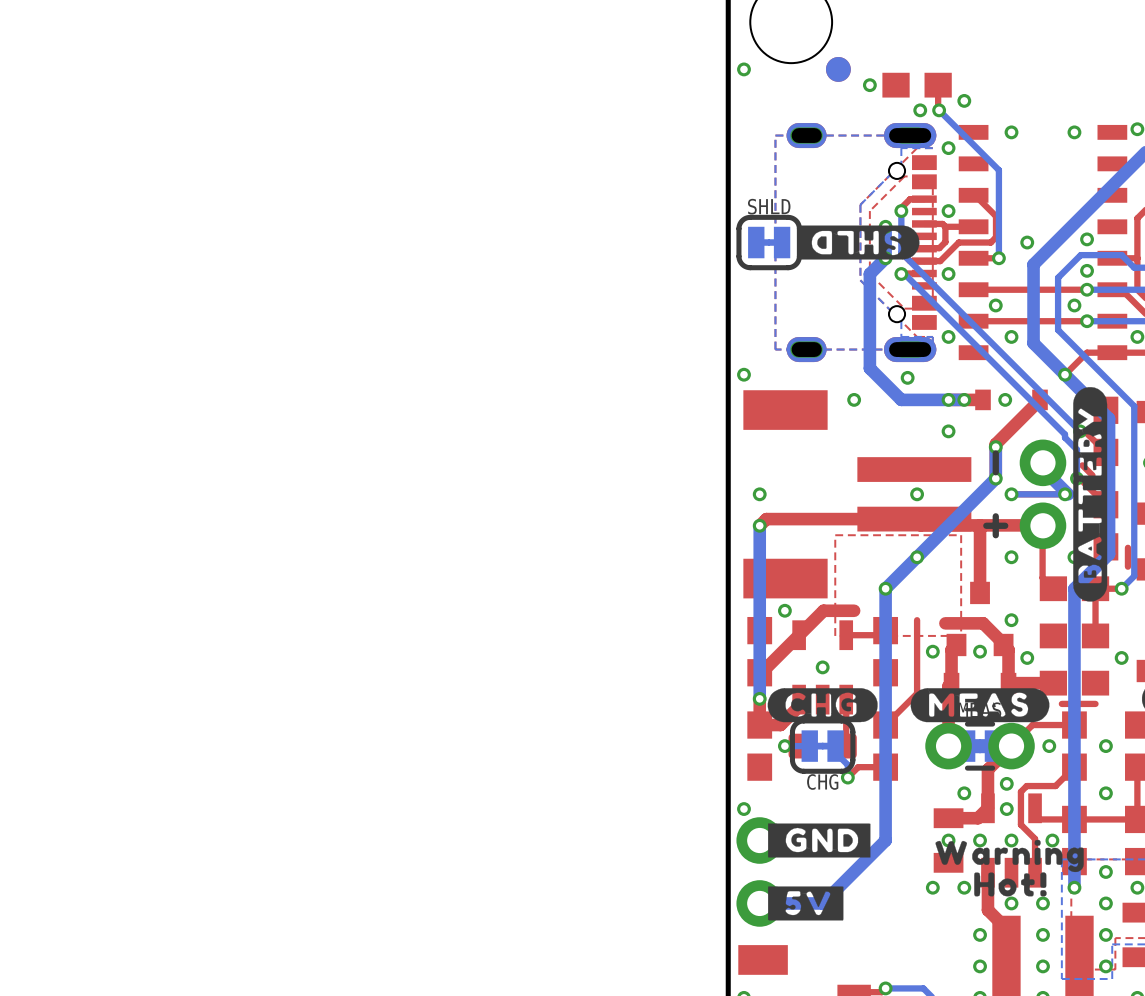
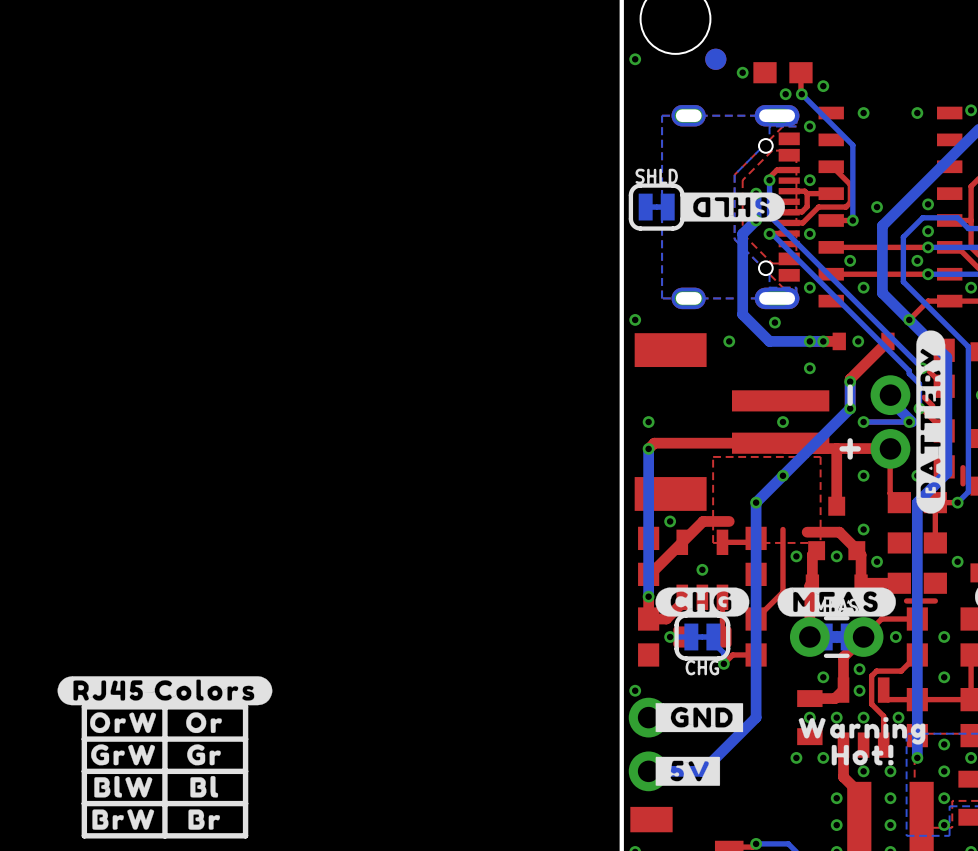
drawing: none -> [57, 676, 273, 830]
line: none -> (164, 706) (164, 835)
line: none -> (245, 706) (245, 835) (84, 835) (84, 706) (245, 706)
line: none -> (245, 739) (84, 739)
line: none -> (245, 771) (84, 771)
line: none -> (245, 803) (84, 803)

